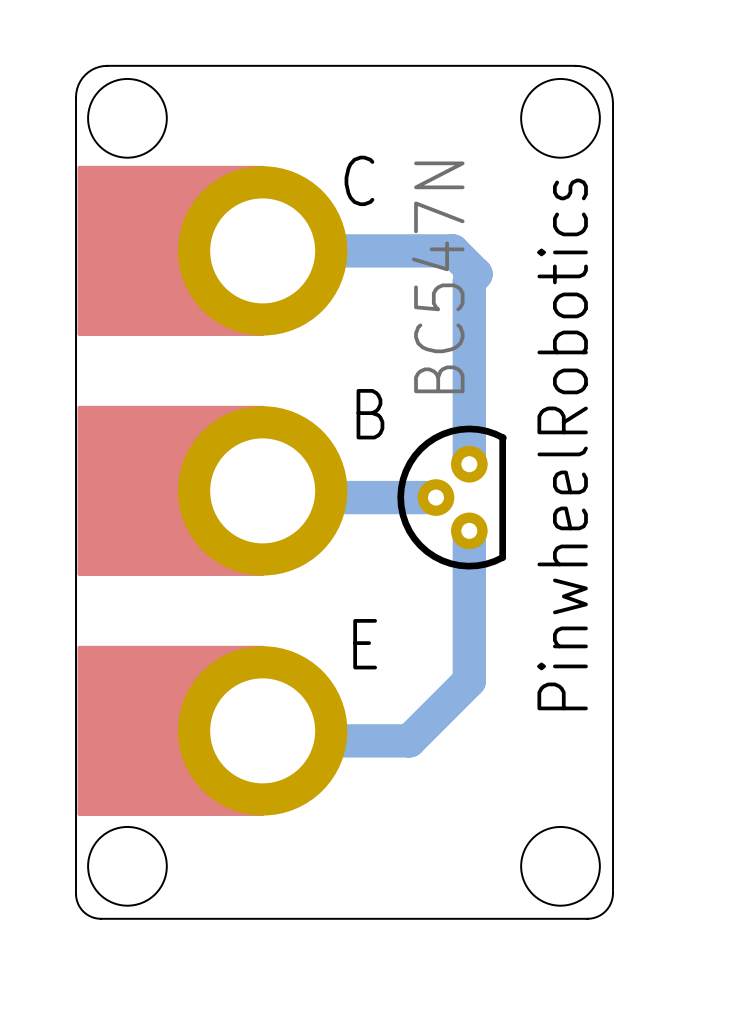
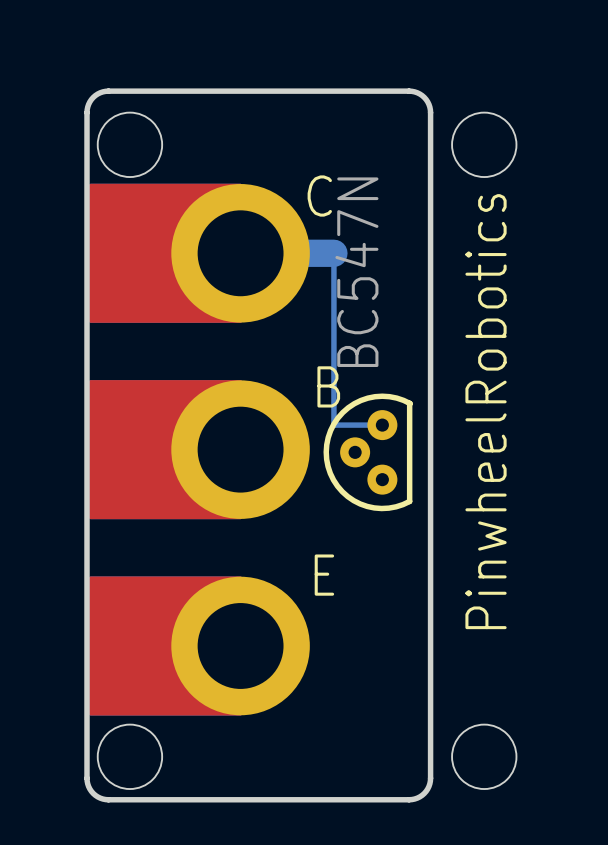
bottom track: (376, 250) (452, 250) (475, 274) (469, 280) (469, 463) -> (333, 253) (333, 425) (382, 425)
bottom track: (433, 495) (435, 497) (319, 497) (309, 507) -> none
part position: (452, 497) -> (368, 452)
bottom track: (461, 531) (469, 530) (469, 680) (409, 740) (276, 740) -> none
board edge: (100, 918) (91, 916) (83, 911) (77, 903) (76, 893) (76, 97) (80, 81) (91, 70) (107, 65) (580, 66) (594, 70) (605, 80) (610, 89) (612, 103) (612, 896) (605, 911) (590, 918) (468, 918) -> (108, 799) (100, 798) (93, 793) (88, 786) (87, 778) (87, 112) (88, 104) (93, 97) (100, 92) (108, 91) (409, 91) (422, 95) (428, 104) (430, 112) (430, 778) (428, 786) (424, 793) (417, 798) (409, 799)
board edge width: thin (100, 918) (468, 918) -> thick (108, 799) (409, 799)

